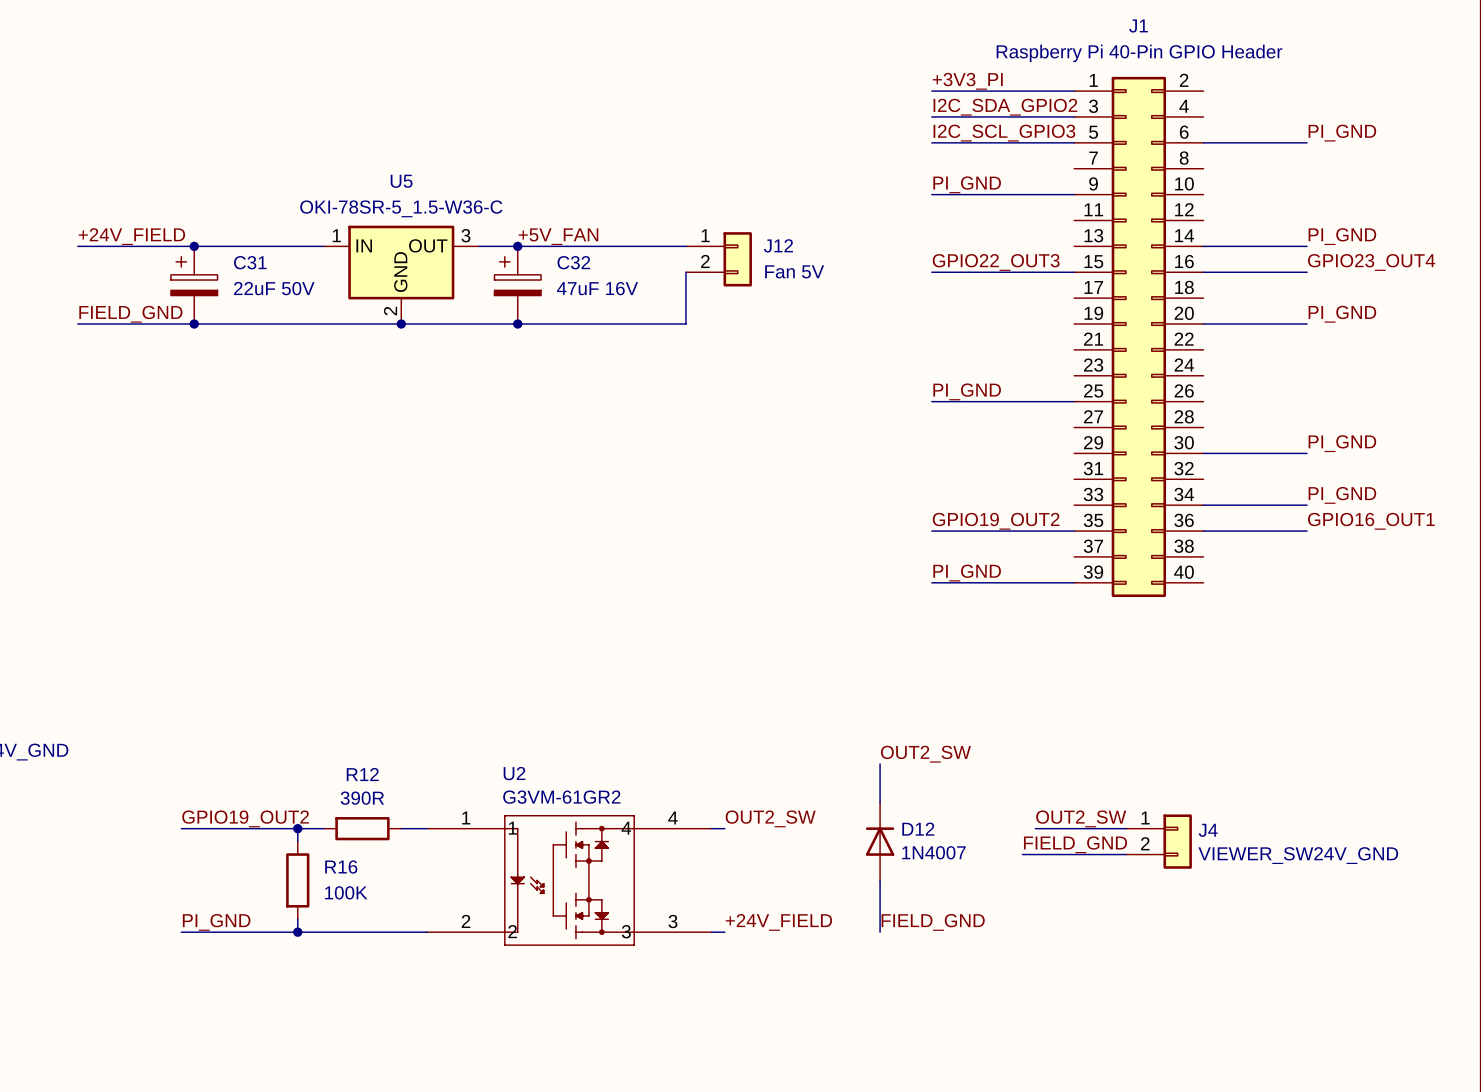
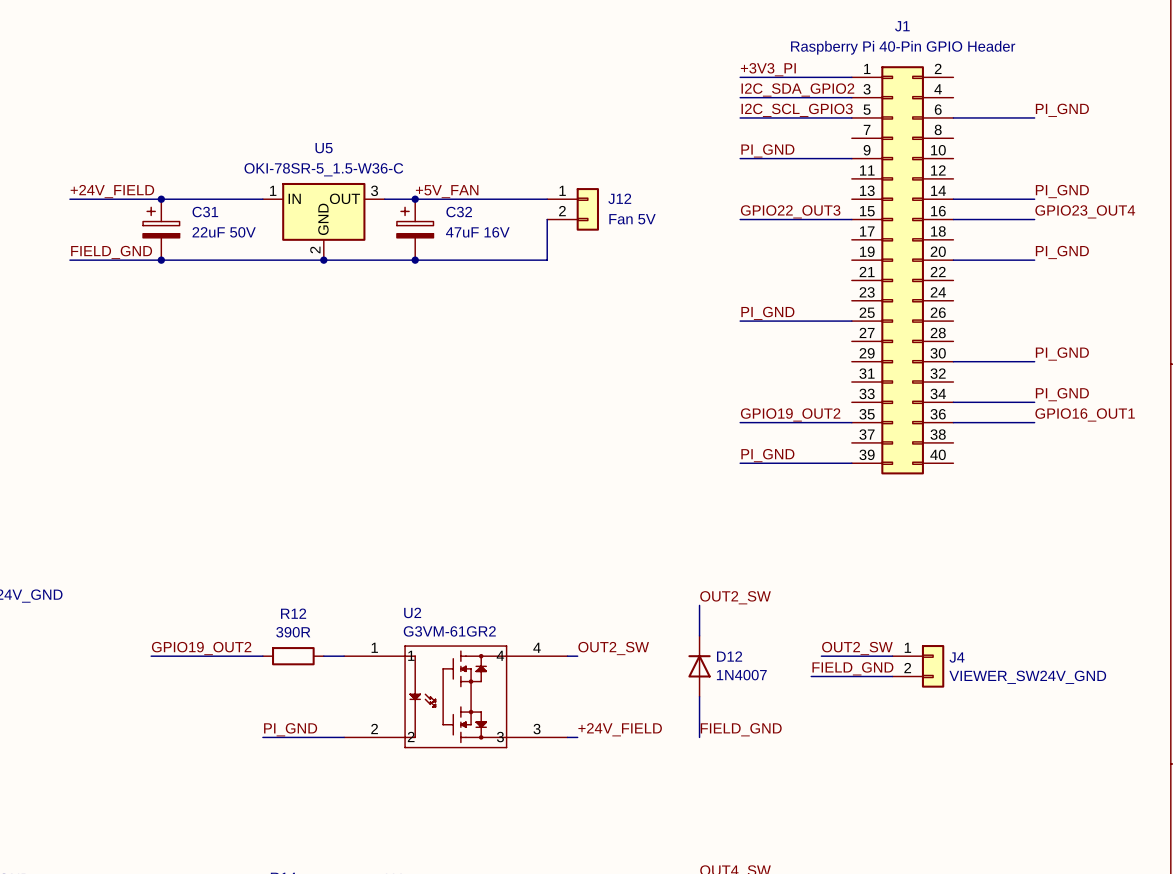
wire: (297, 828) (297, 841) -> none
junction: (297, 828) -> none
R16: 100K (297, 880) -> none
wire: (297, 919) (297, 932) -> none
label position: PI_GND (216, 922) -> PI_GND (290, 729)
wire: (181, 932) (323, 932) -> none
junction: (297, 932) -> none

